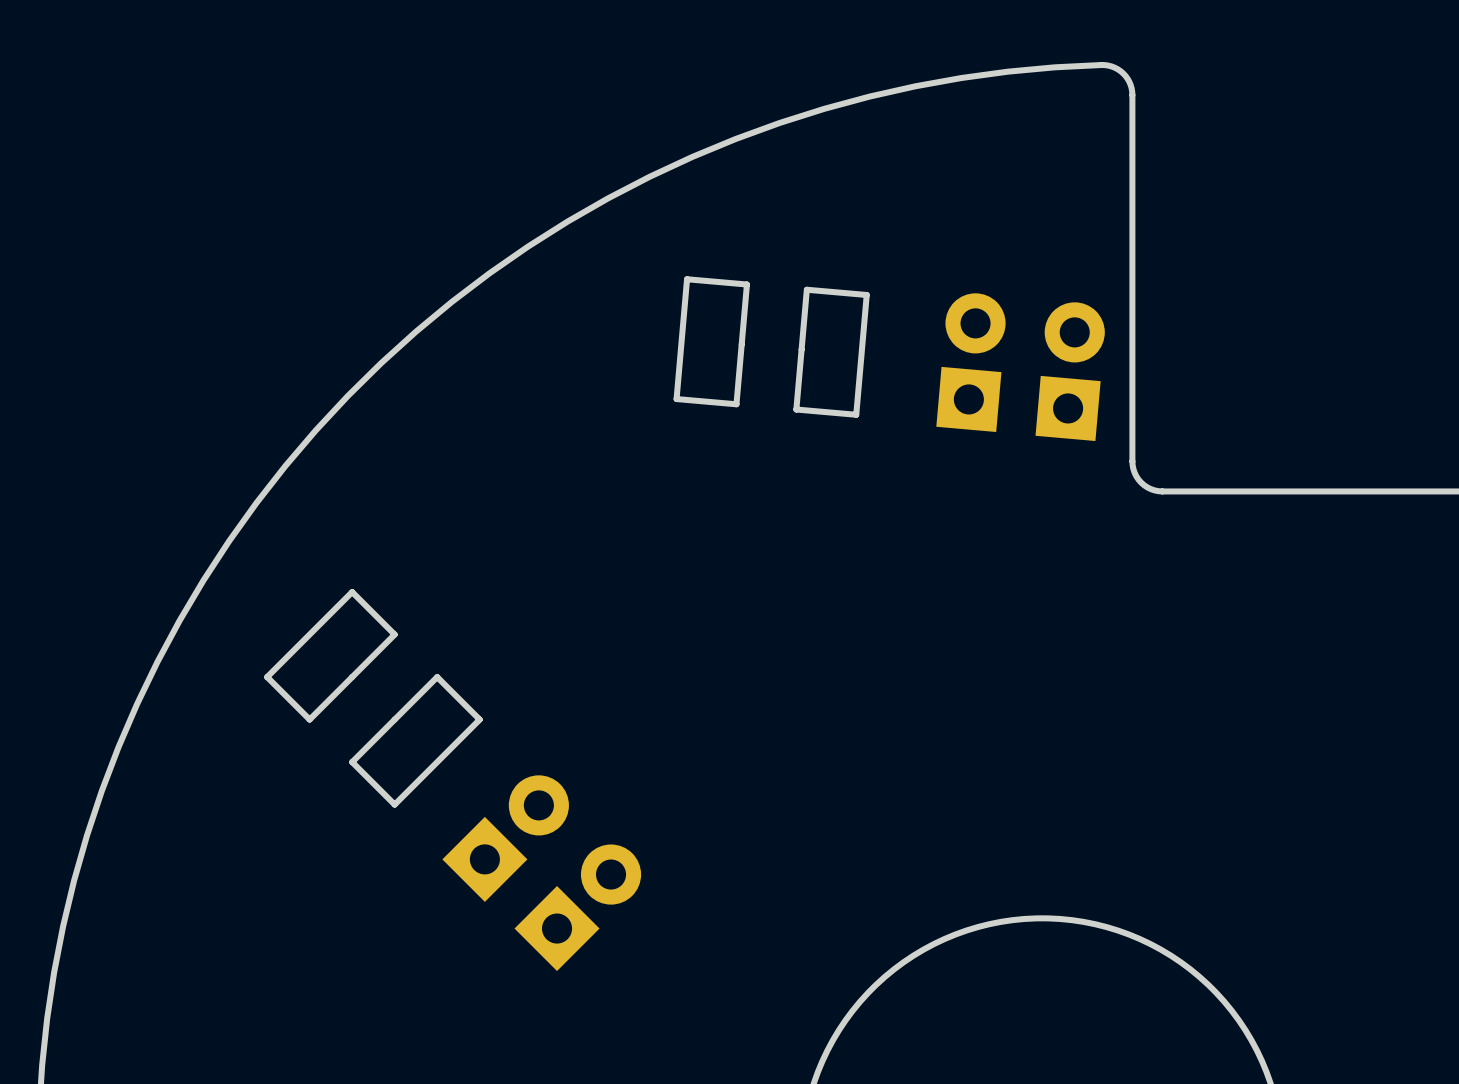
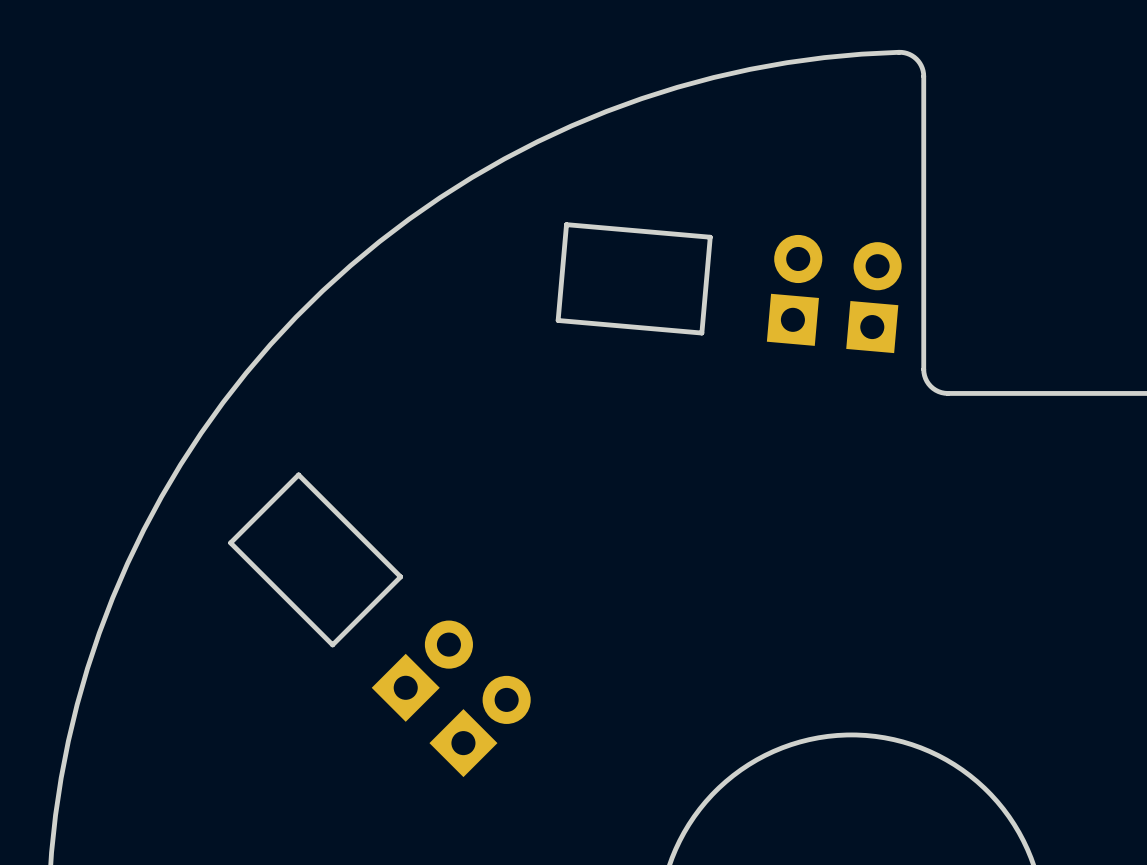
board edge: (687, 279) (676, 399) (736, 404) (746, 284) (687, 279) -> none
board edge: none -> (566, 224) (558, 320) (701, 333) (710, 237) (566, 224)
board edge: (806, 289) (796, 409) (856, 414) (866, 294) (806, 289) -> none
board edge: (351, 593) (352, 592) (394, 634) (309, 719) (267, 677) -> (333, 643) (231, 541)
board edge: (478, 720) (479, 719) (437, 677) (352, 762) (394, 804) -> (400, 576) (298, 474)

